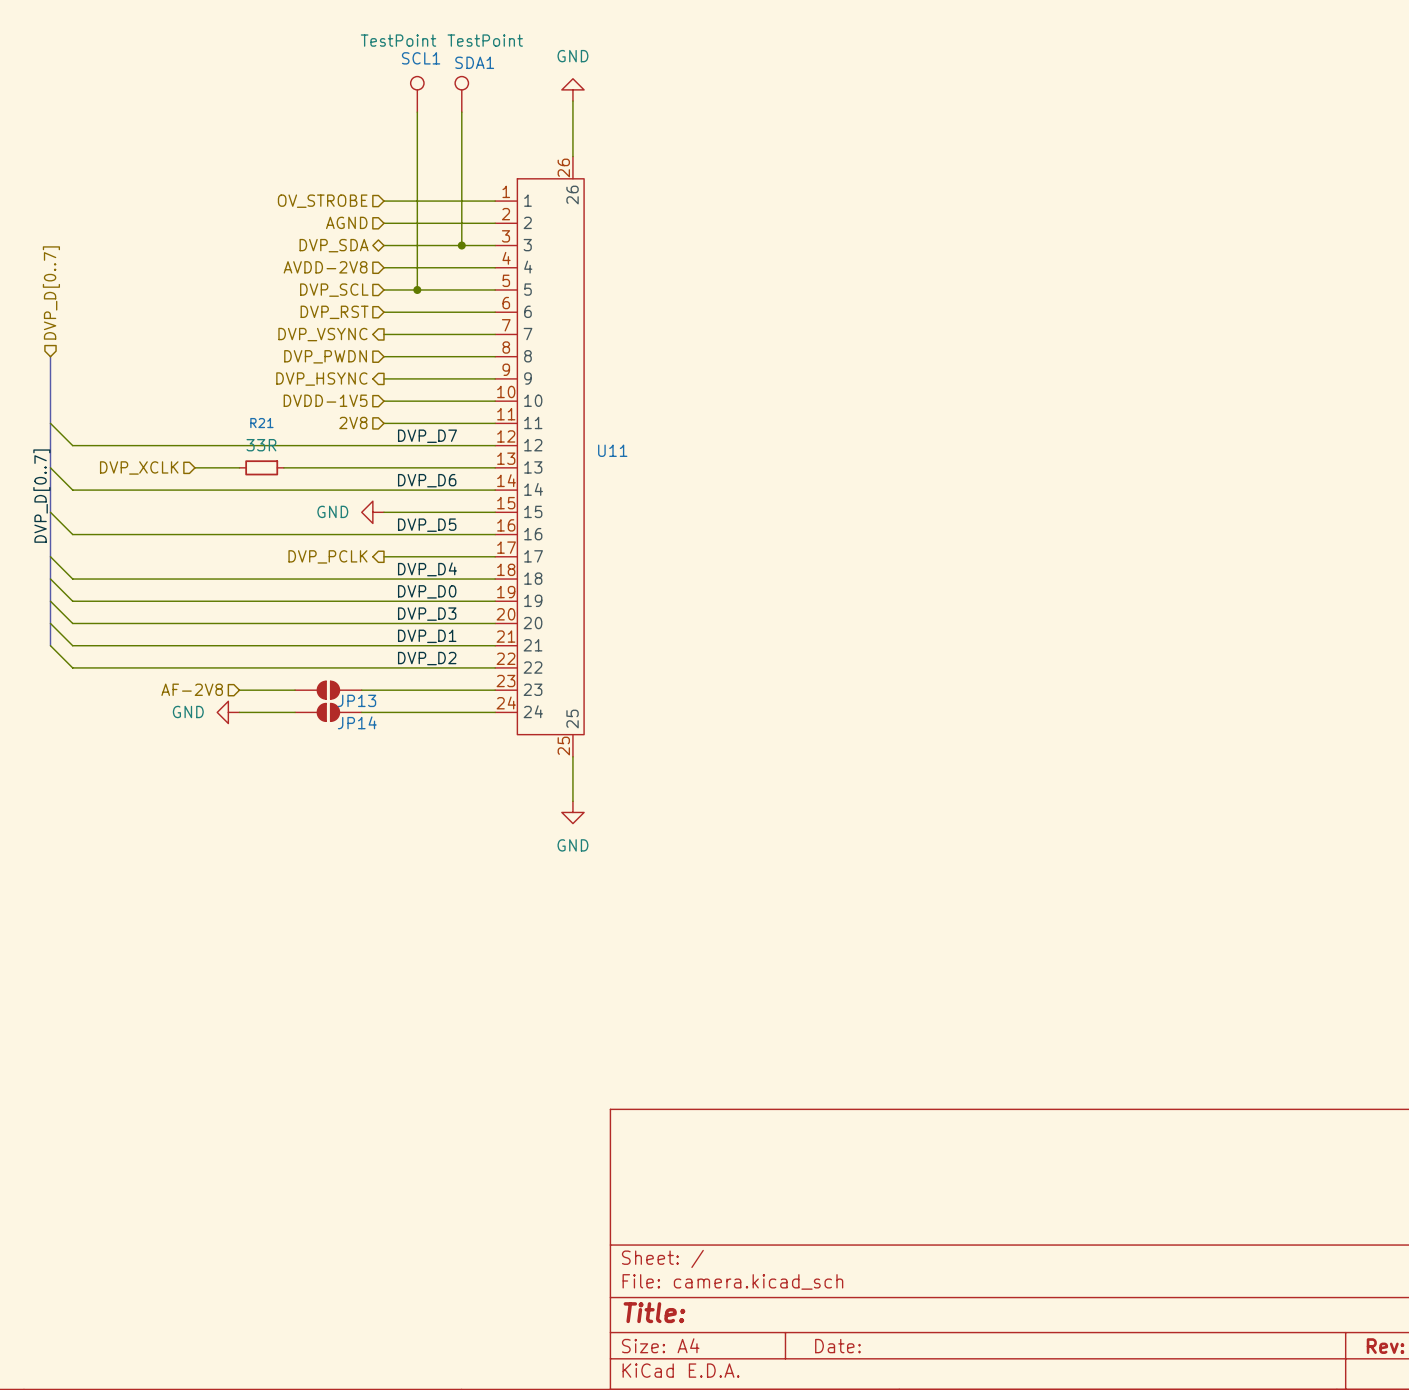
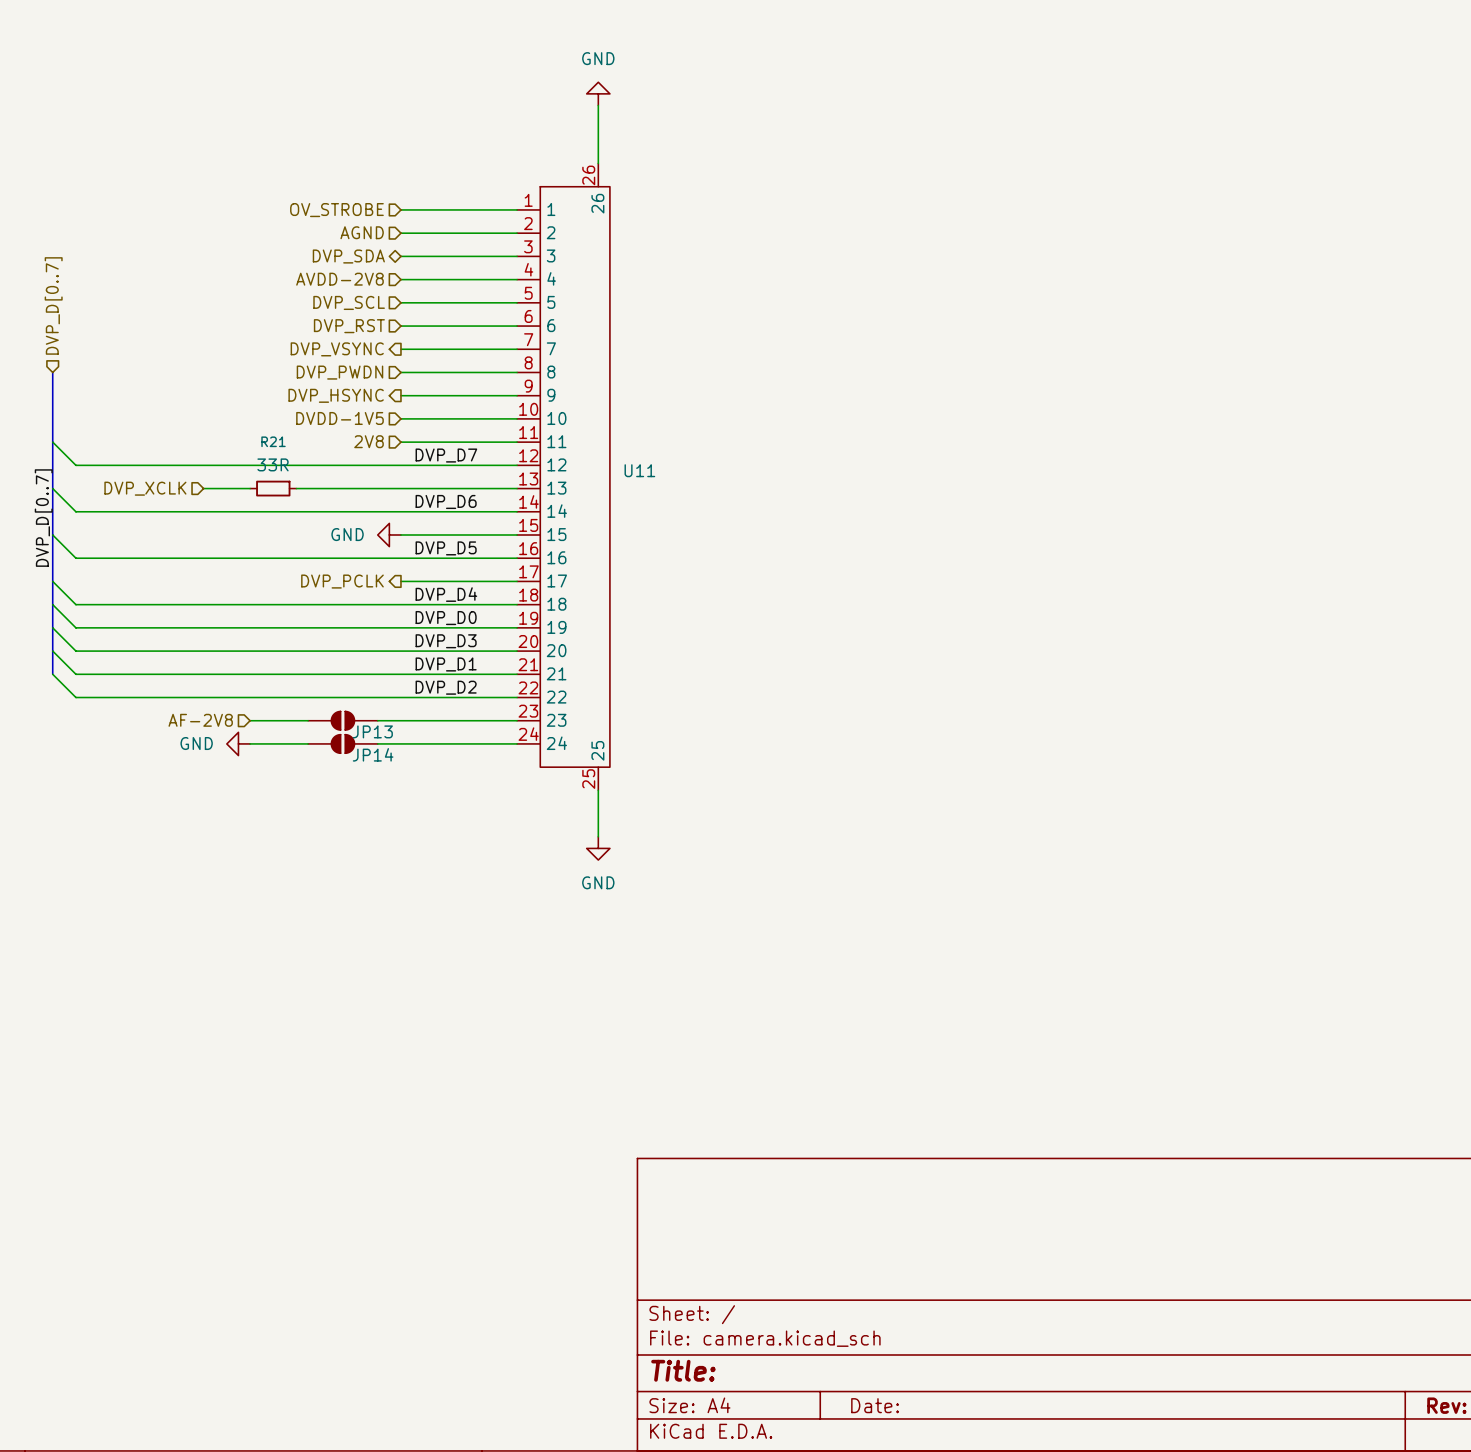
SCL1: TestPoint (417, 94) -> none
SDA1: TestPoint (461, 94) -> none
wire: (417, 112) (417, 289) -> none
wire: (461, 112) (461, 245) -> none
junction: (461, 245) -> none
junction: (417, 289) -> none

